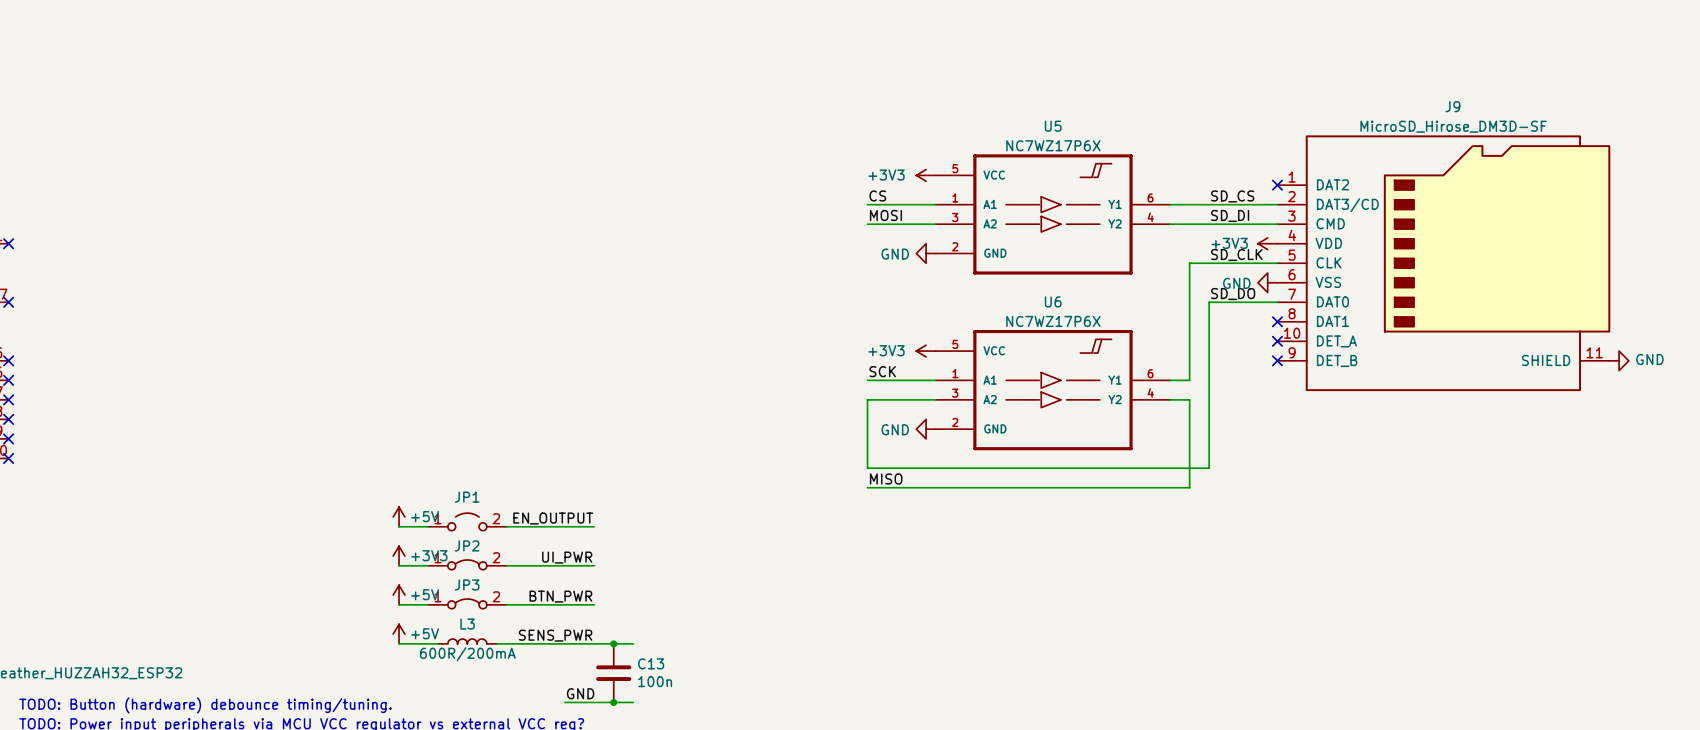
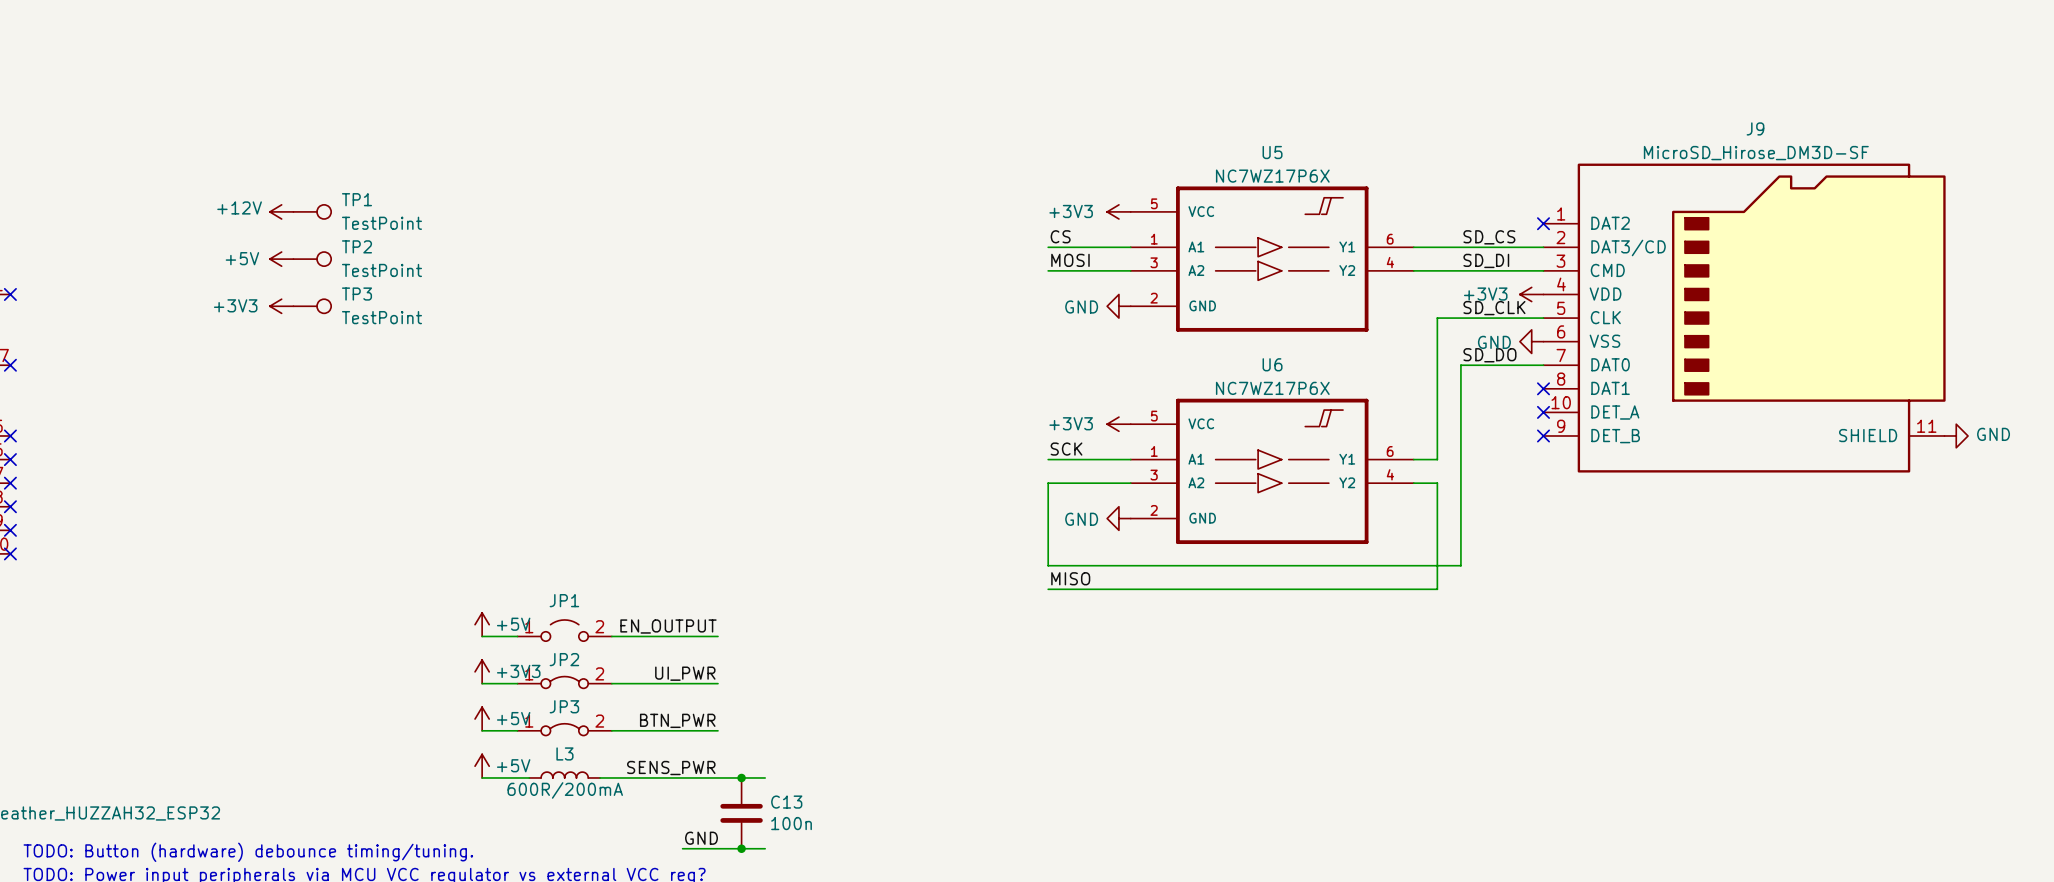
power symbol: none -> +12V (281, 211)
TP1: none -> TestPoint (312, 211)
power symbol: none -> +5V (281, 259)
TP2: none -> TestPoint (312, 259)
power symbol: none -> +3V3 (281, 306)
TP3: none -> TestPoint (312, 306)

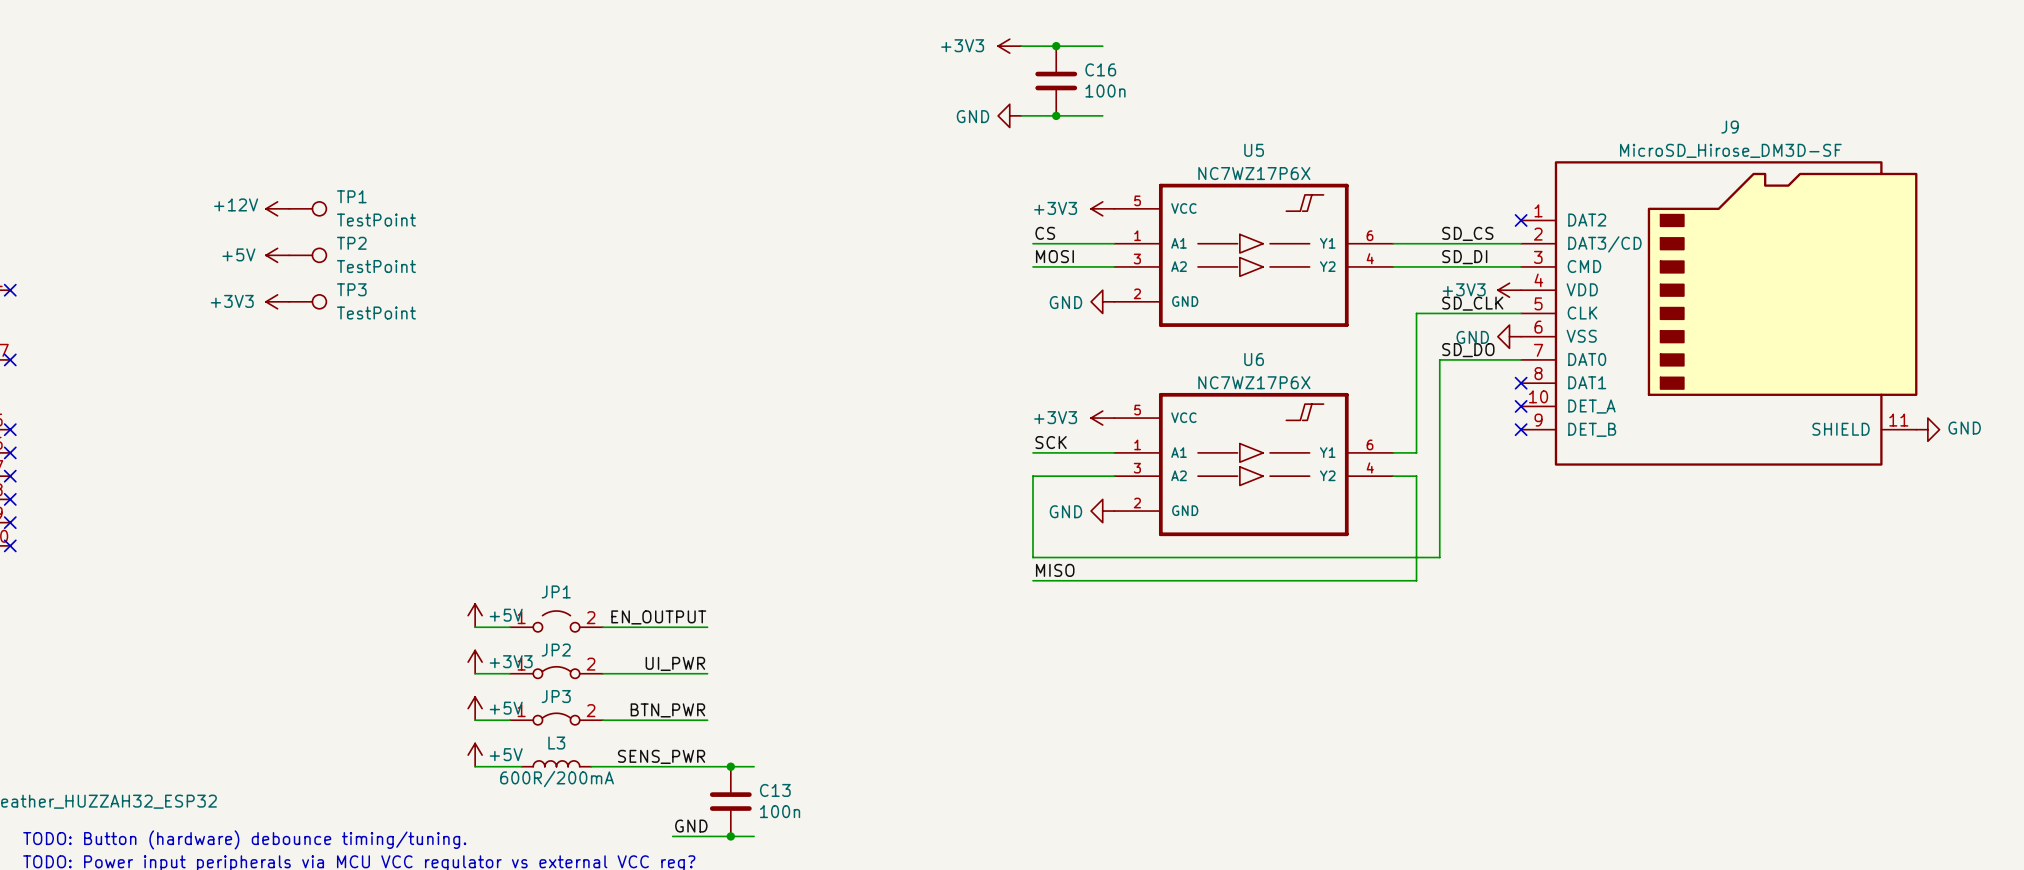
power symbol: none -> +3V3 (1009, 46)
wire: none -> (1021, 46) (1102, 46)
junction: none -> (1056, 46)
C16: none -> 100n (1056, 81)
power symbol: none -> GND (1009, 115)
wire: none -> (1021, 115) (1102, 115)
junction: none -> (1056, 115)

